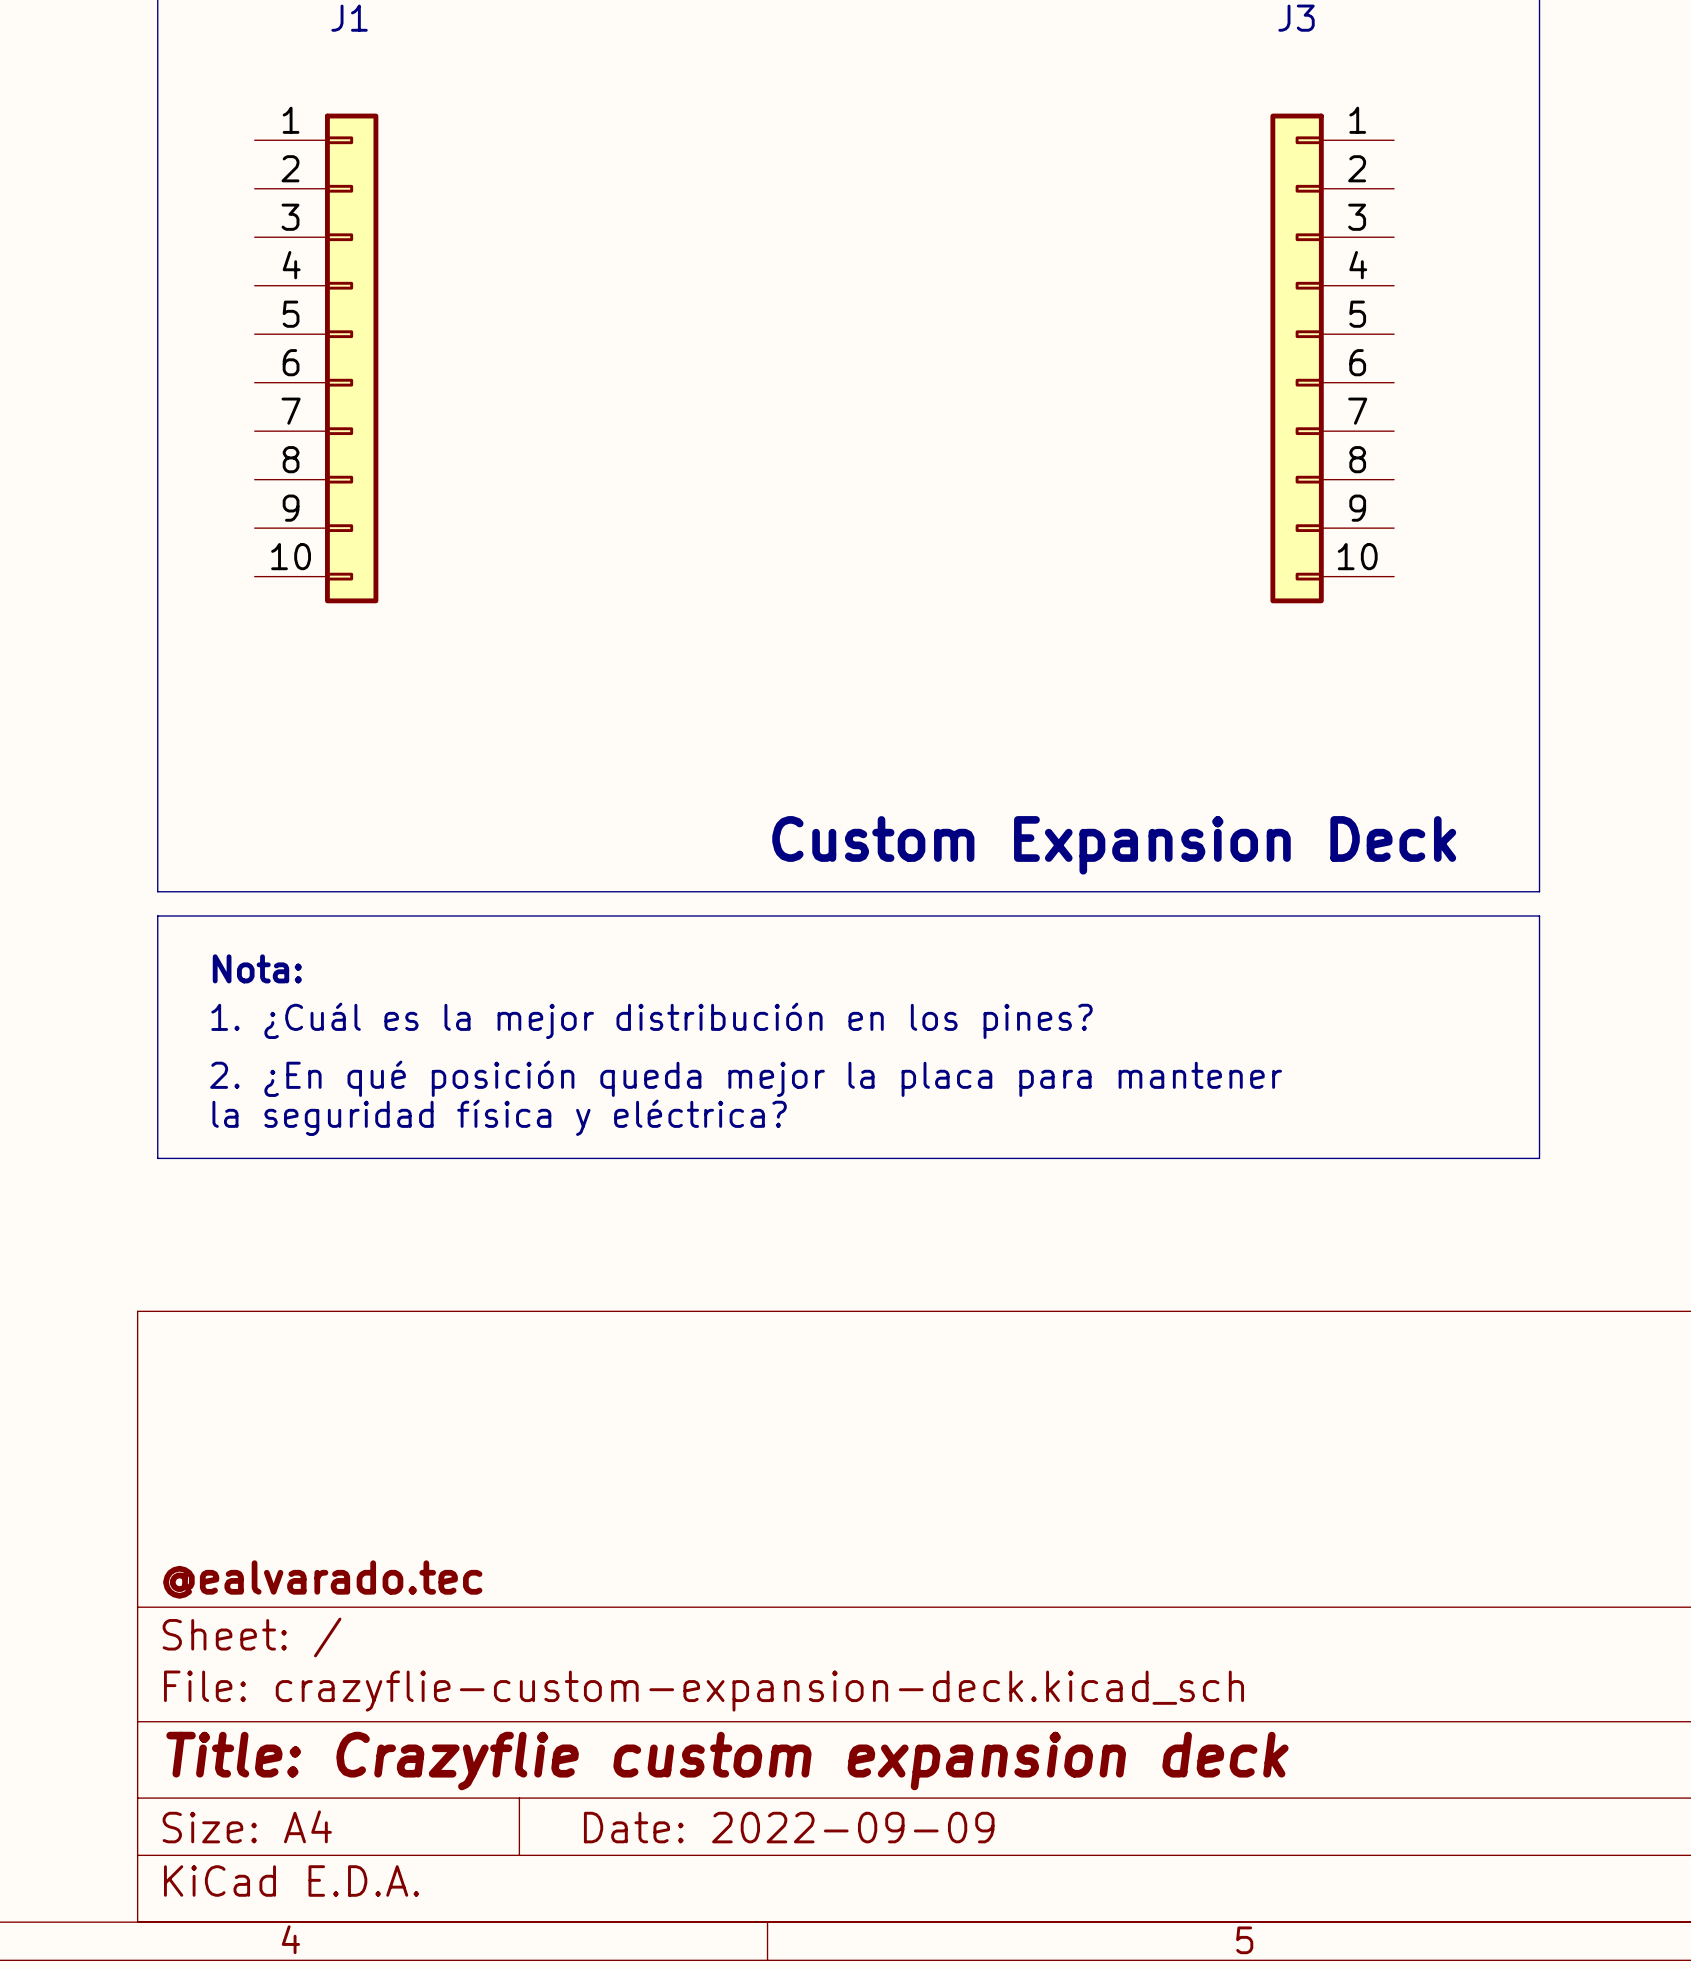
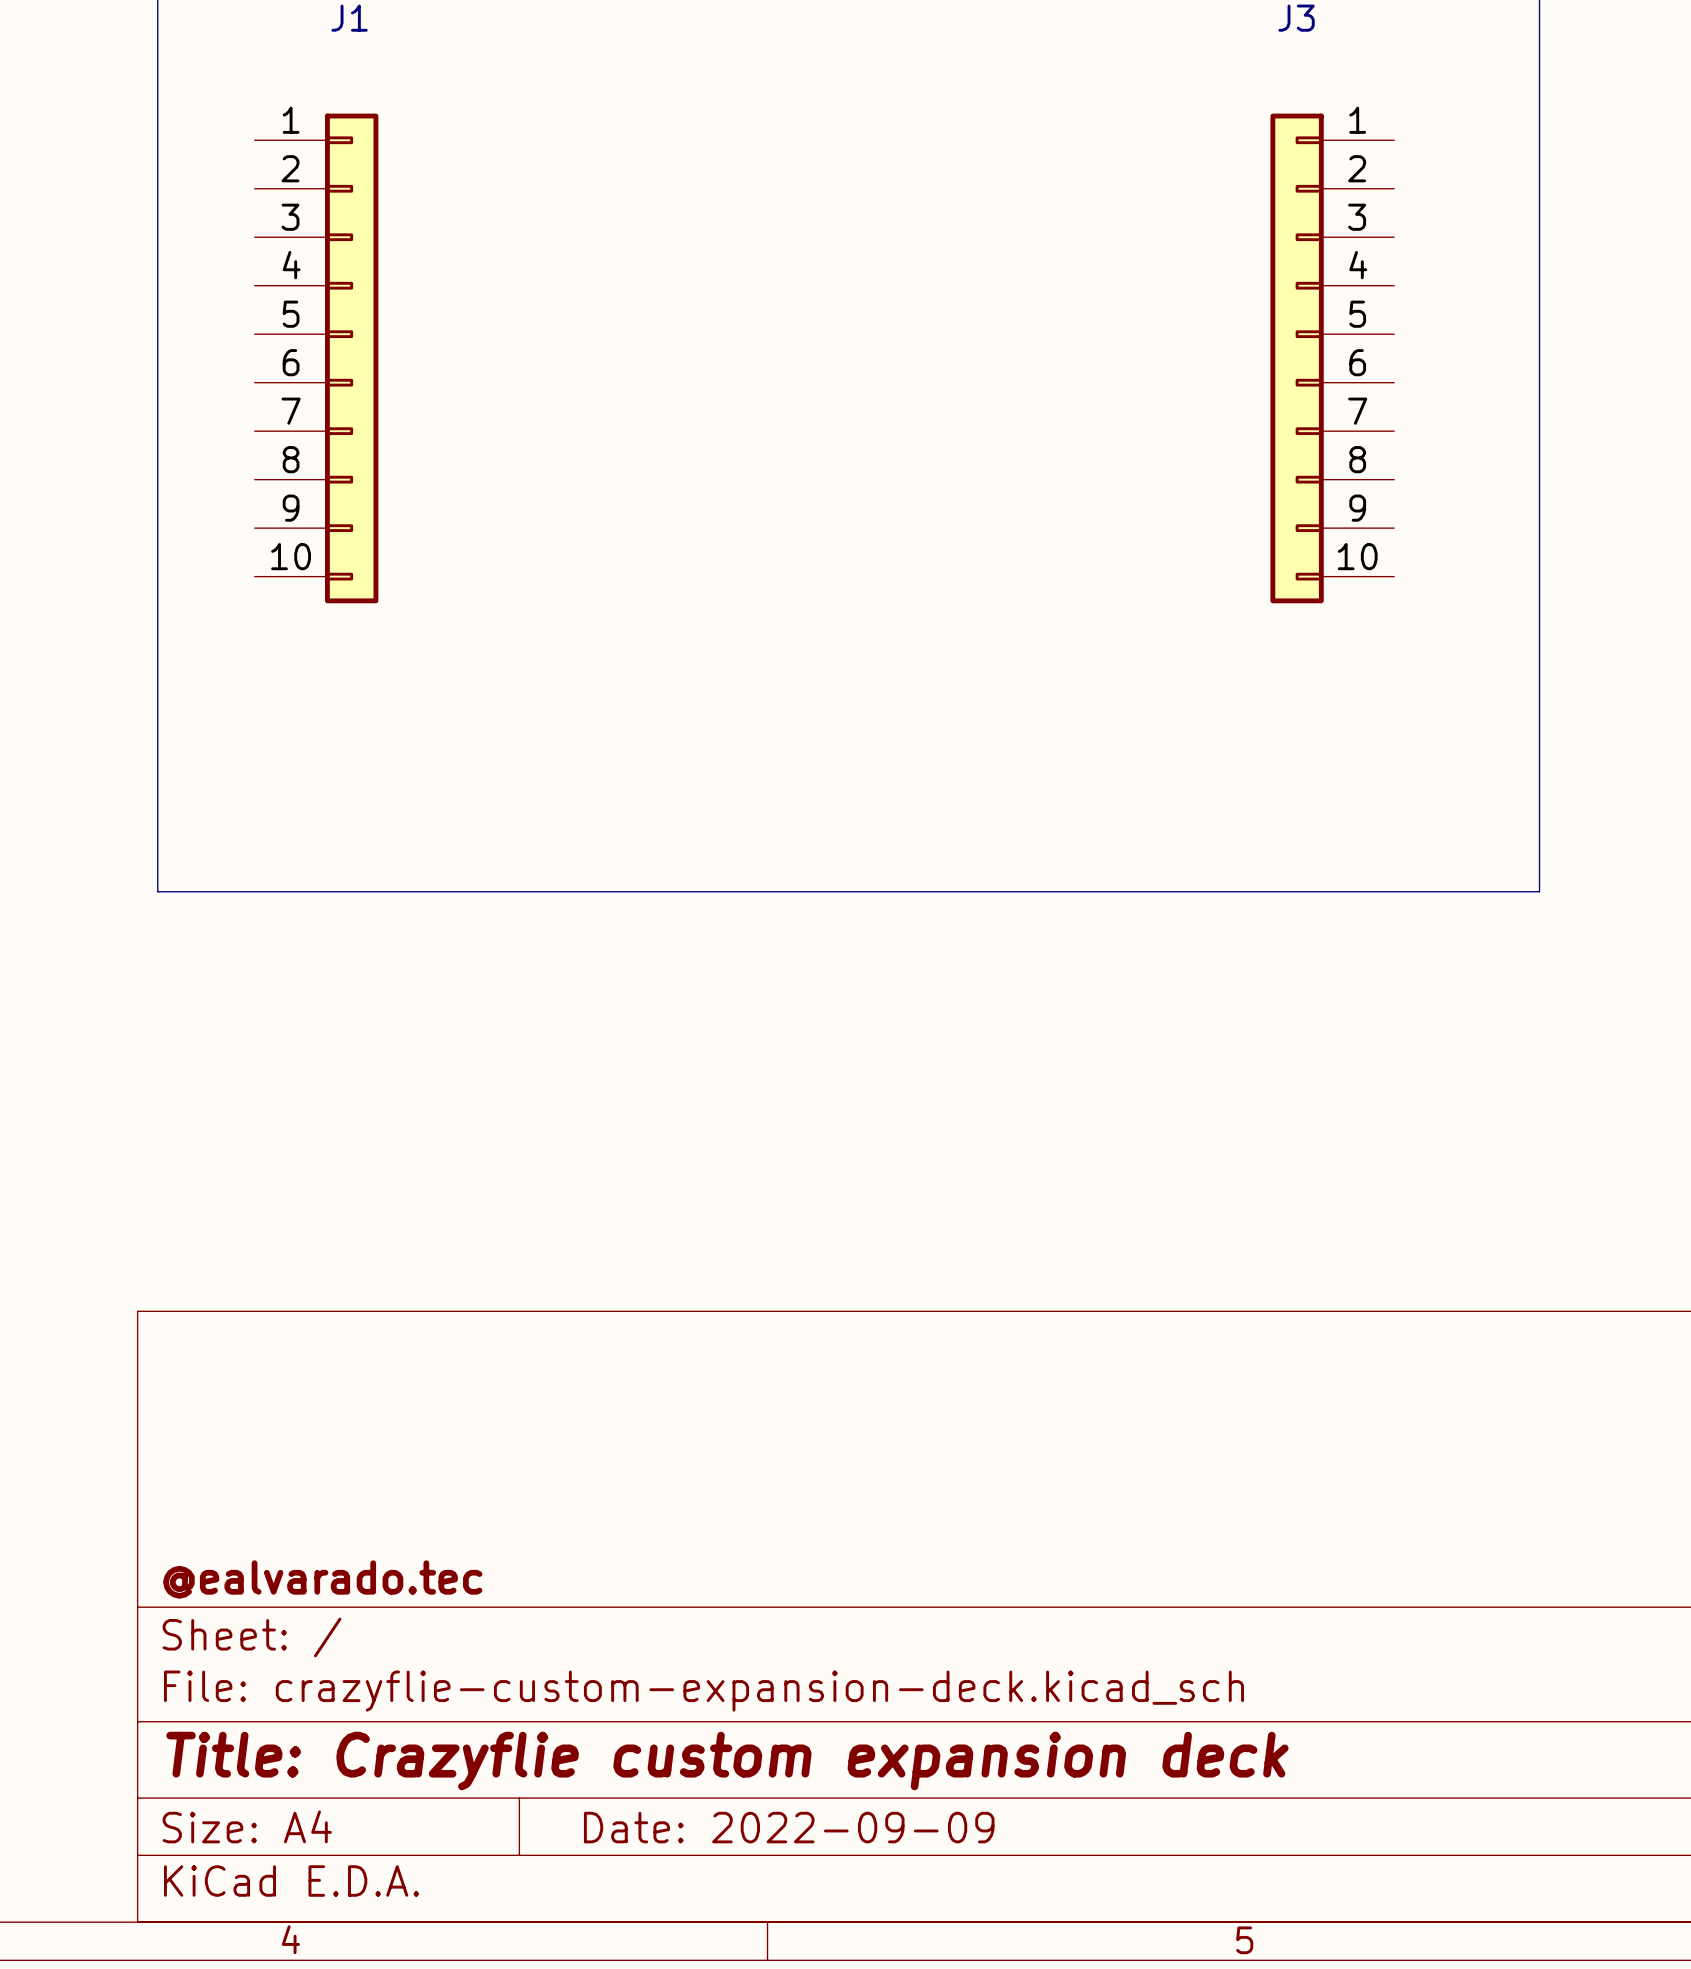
text: Custom Expansion Deck (1114, 845) -> none
line: (157, 915) (157, 1158) (1539, 1158) (1539, 915) (157, 915) -> none
text: Nota: (257, 968) -> none
text: 1. ¿Cuál es la mejor distribución en los pines? (651, 1020) -> none
text: 2. ¿En qué posición queda mejor la placa para mantener (746, 1078) -> none
text: la seguridad física y eléctrica? (499, 1117) -> none

